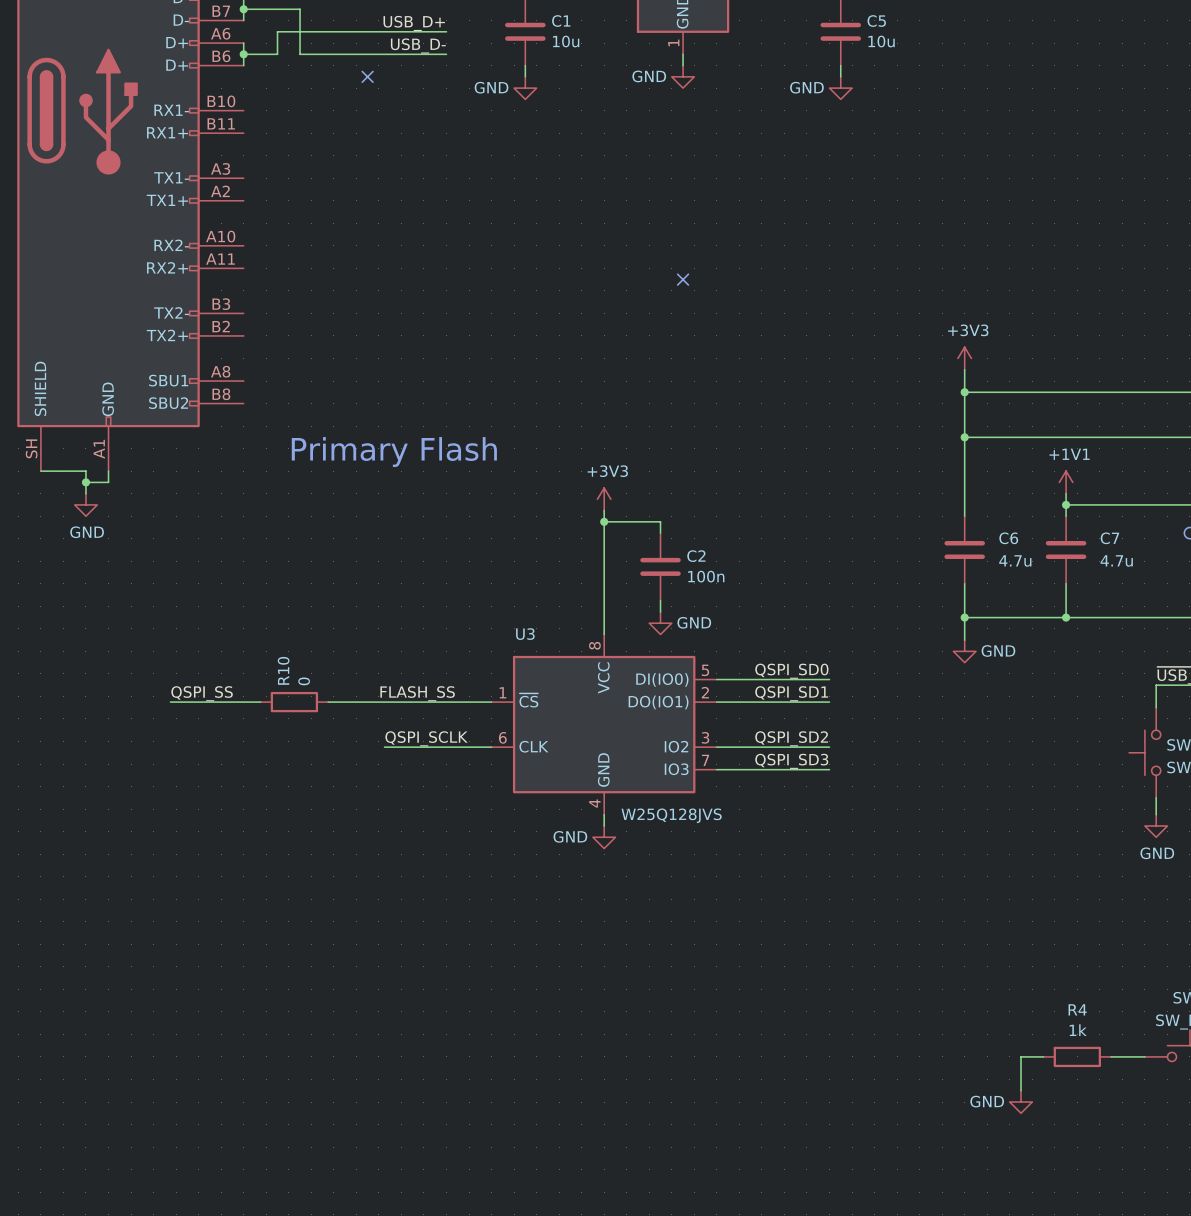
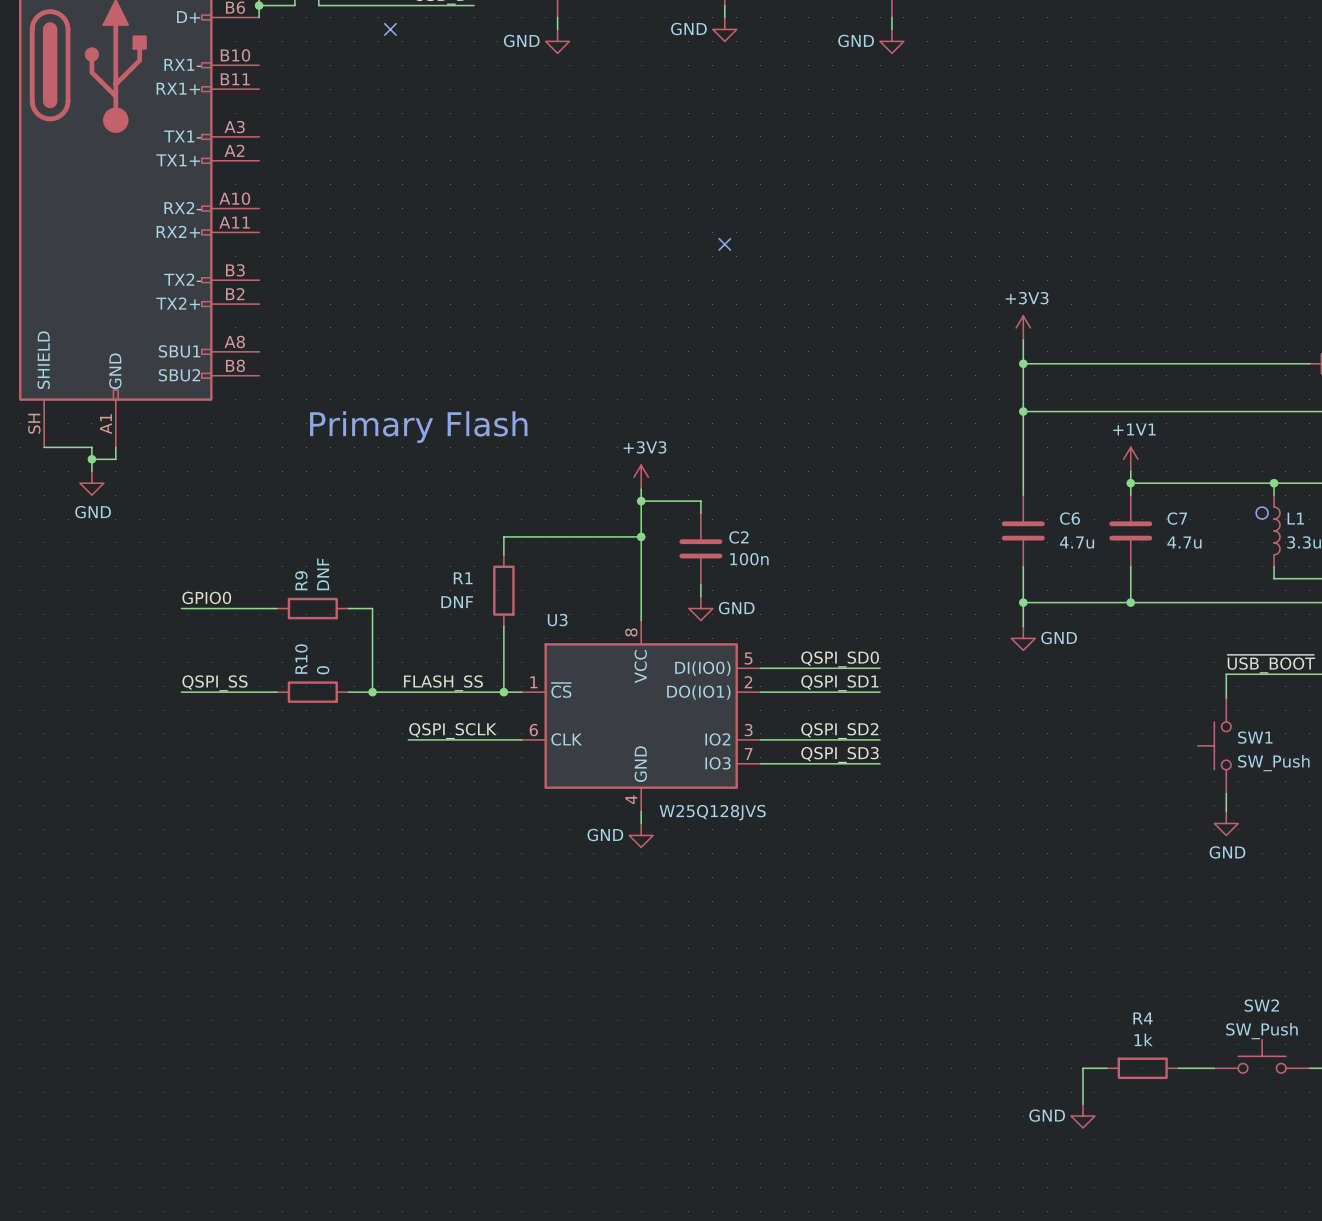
wire: none -> (641, 536) (503, 536) (503, 554)
junction: none -> (641, 536)
R1: none -> DNF (503, 590)
label: none -> GPIO0 (206, 597)
wire: none -> (181, 608) (277, 608)
R9: none -> DNF (312, 608)
wire: none -> (348, 608) (372, 608) (372, 692)
wire: none -> (503, 626) (503, 692)
junction: none -> (372, 692)
junction: none -> (503, 692)

